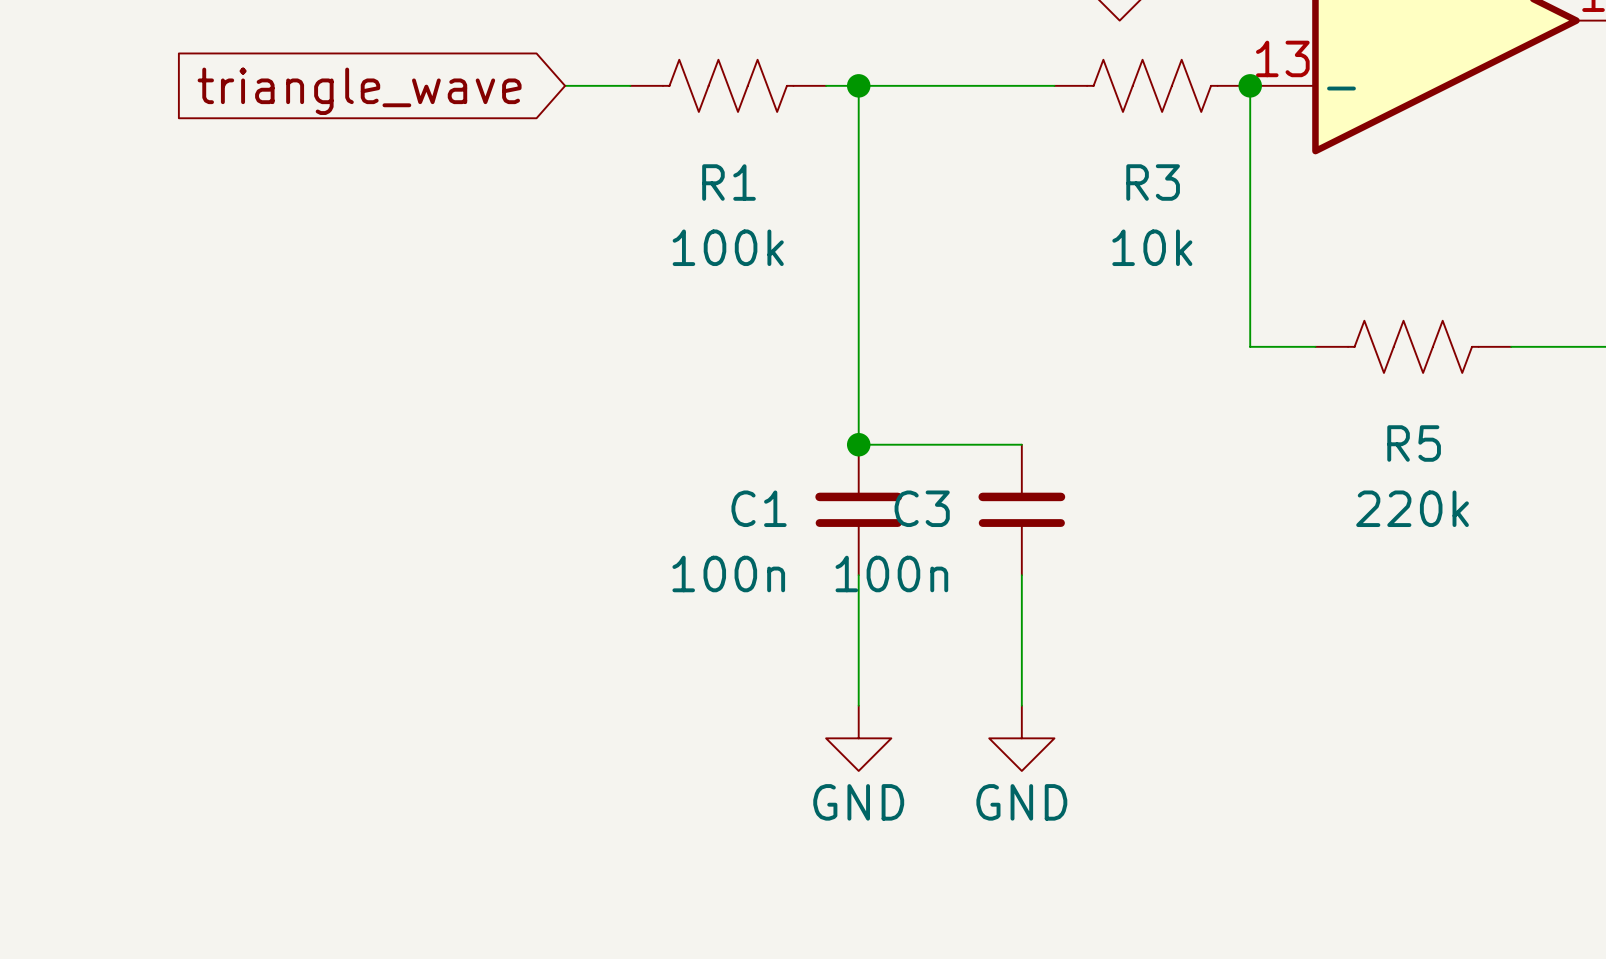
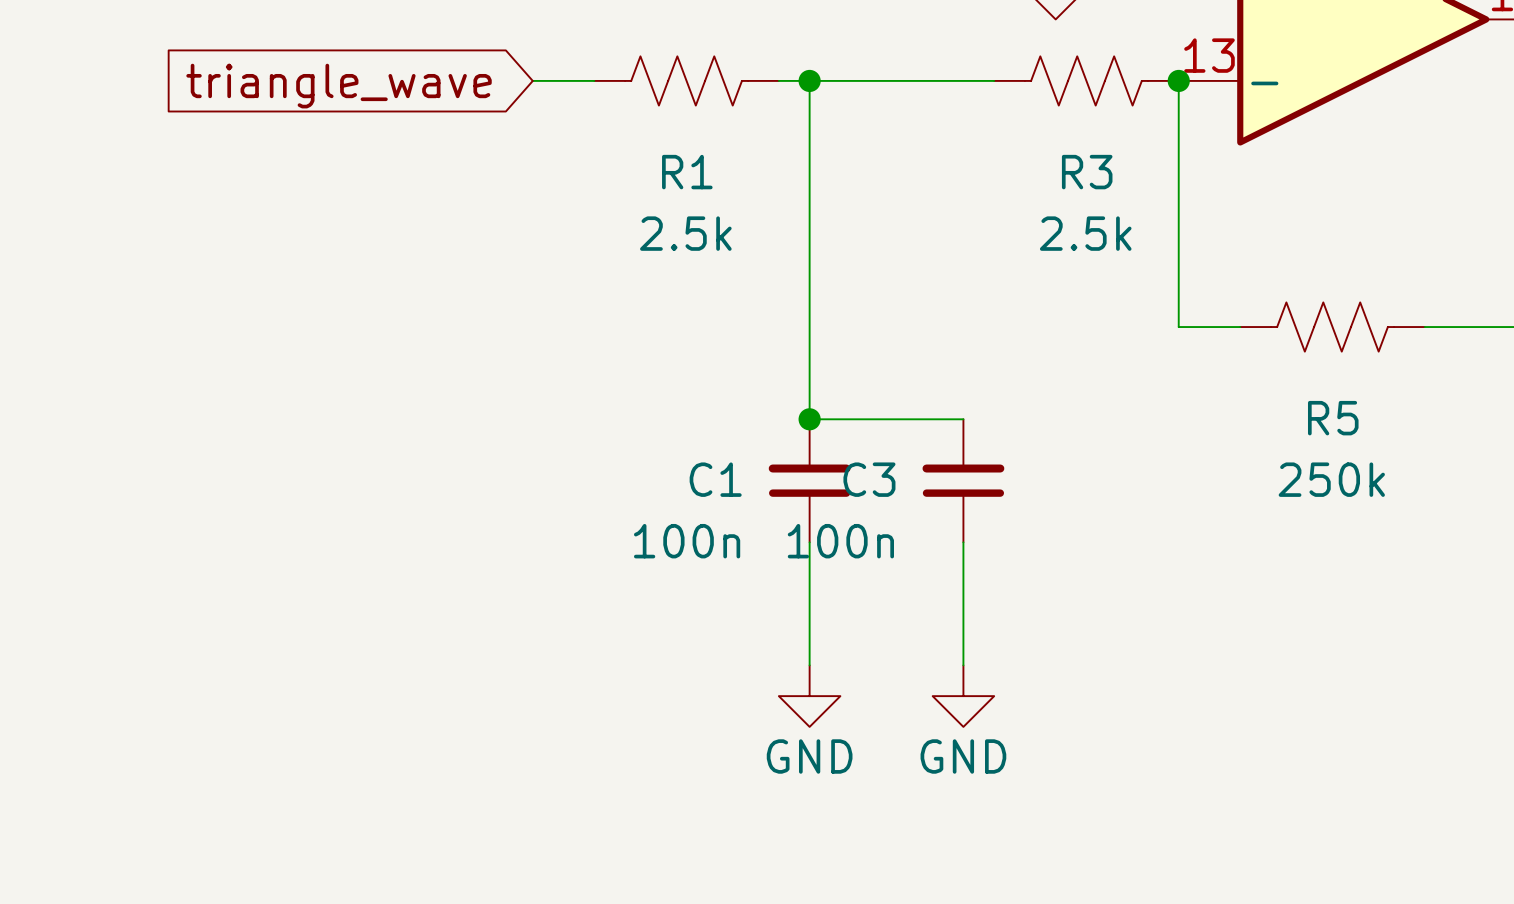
R1 value: 100k (728, 247) -> 2.5k (685, 233)
R3 value: 10k (1152, 247) -> 2.5k (1085, 233)
R5 value: 220k (1412, 508) -> 250k (1331, 479)

